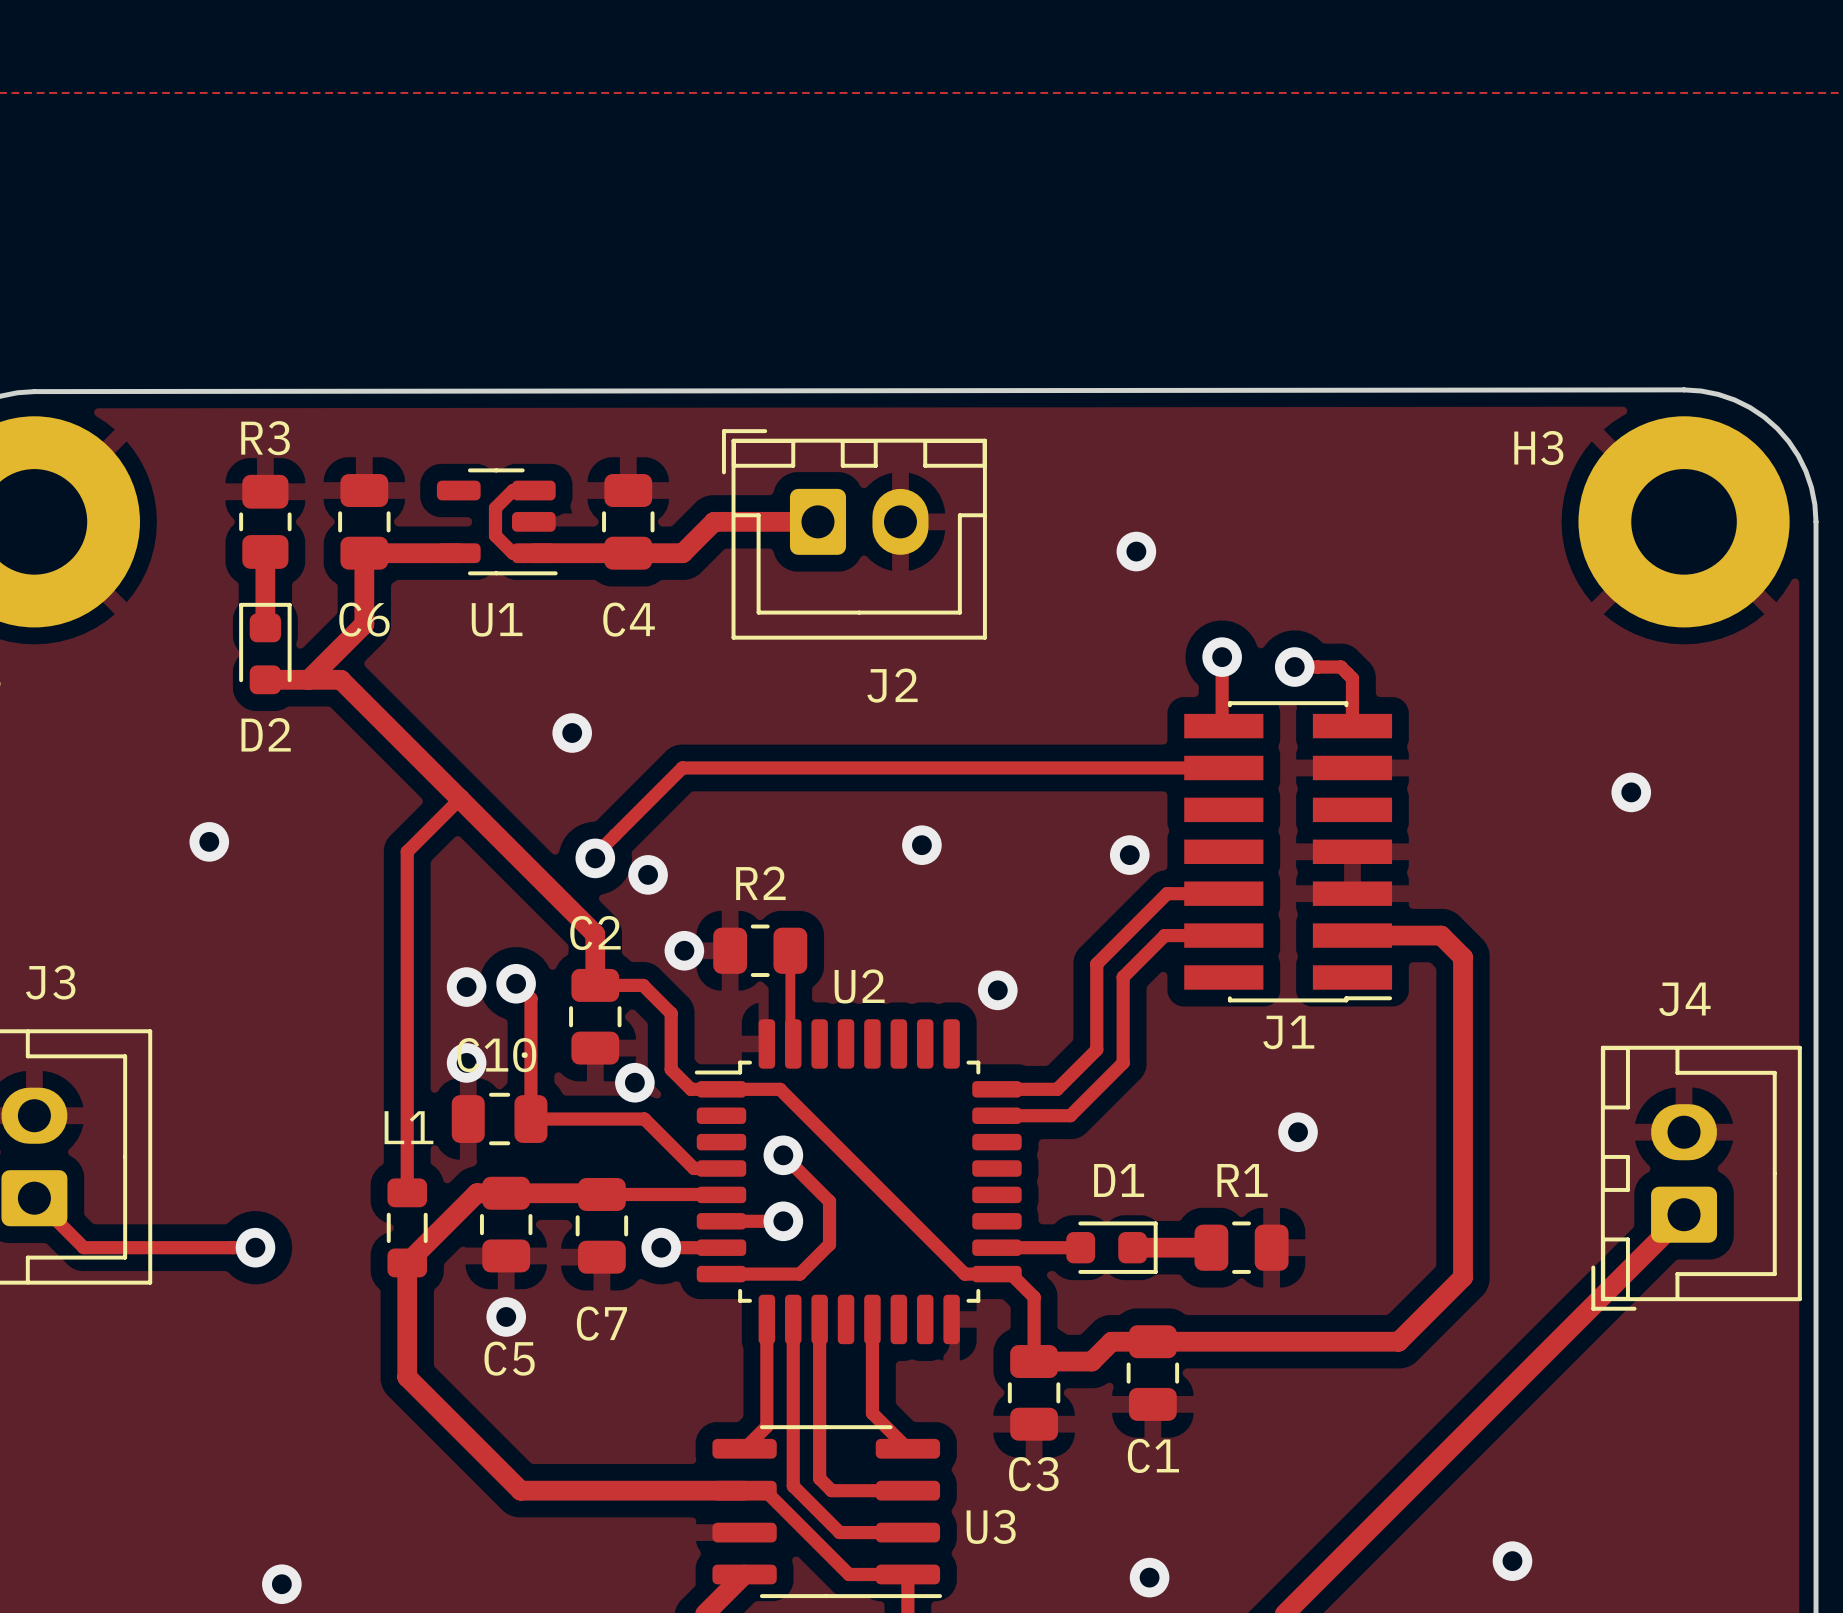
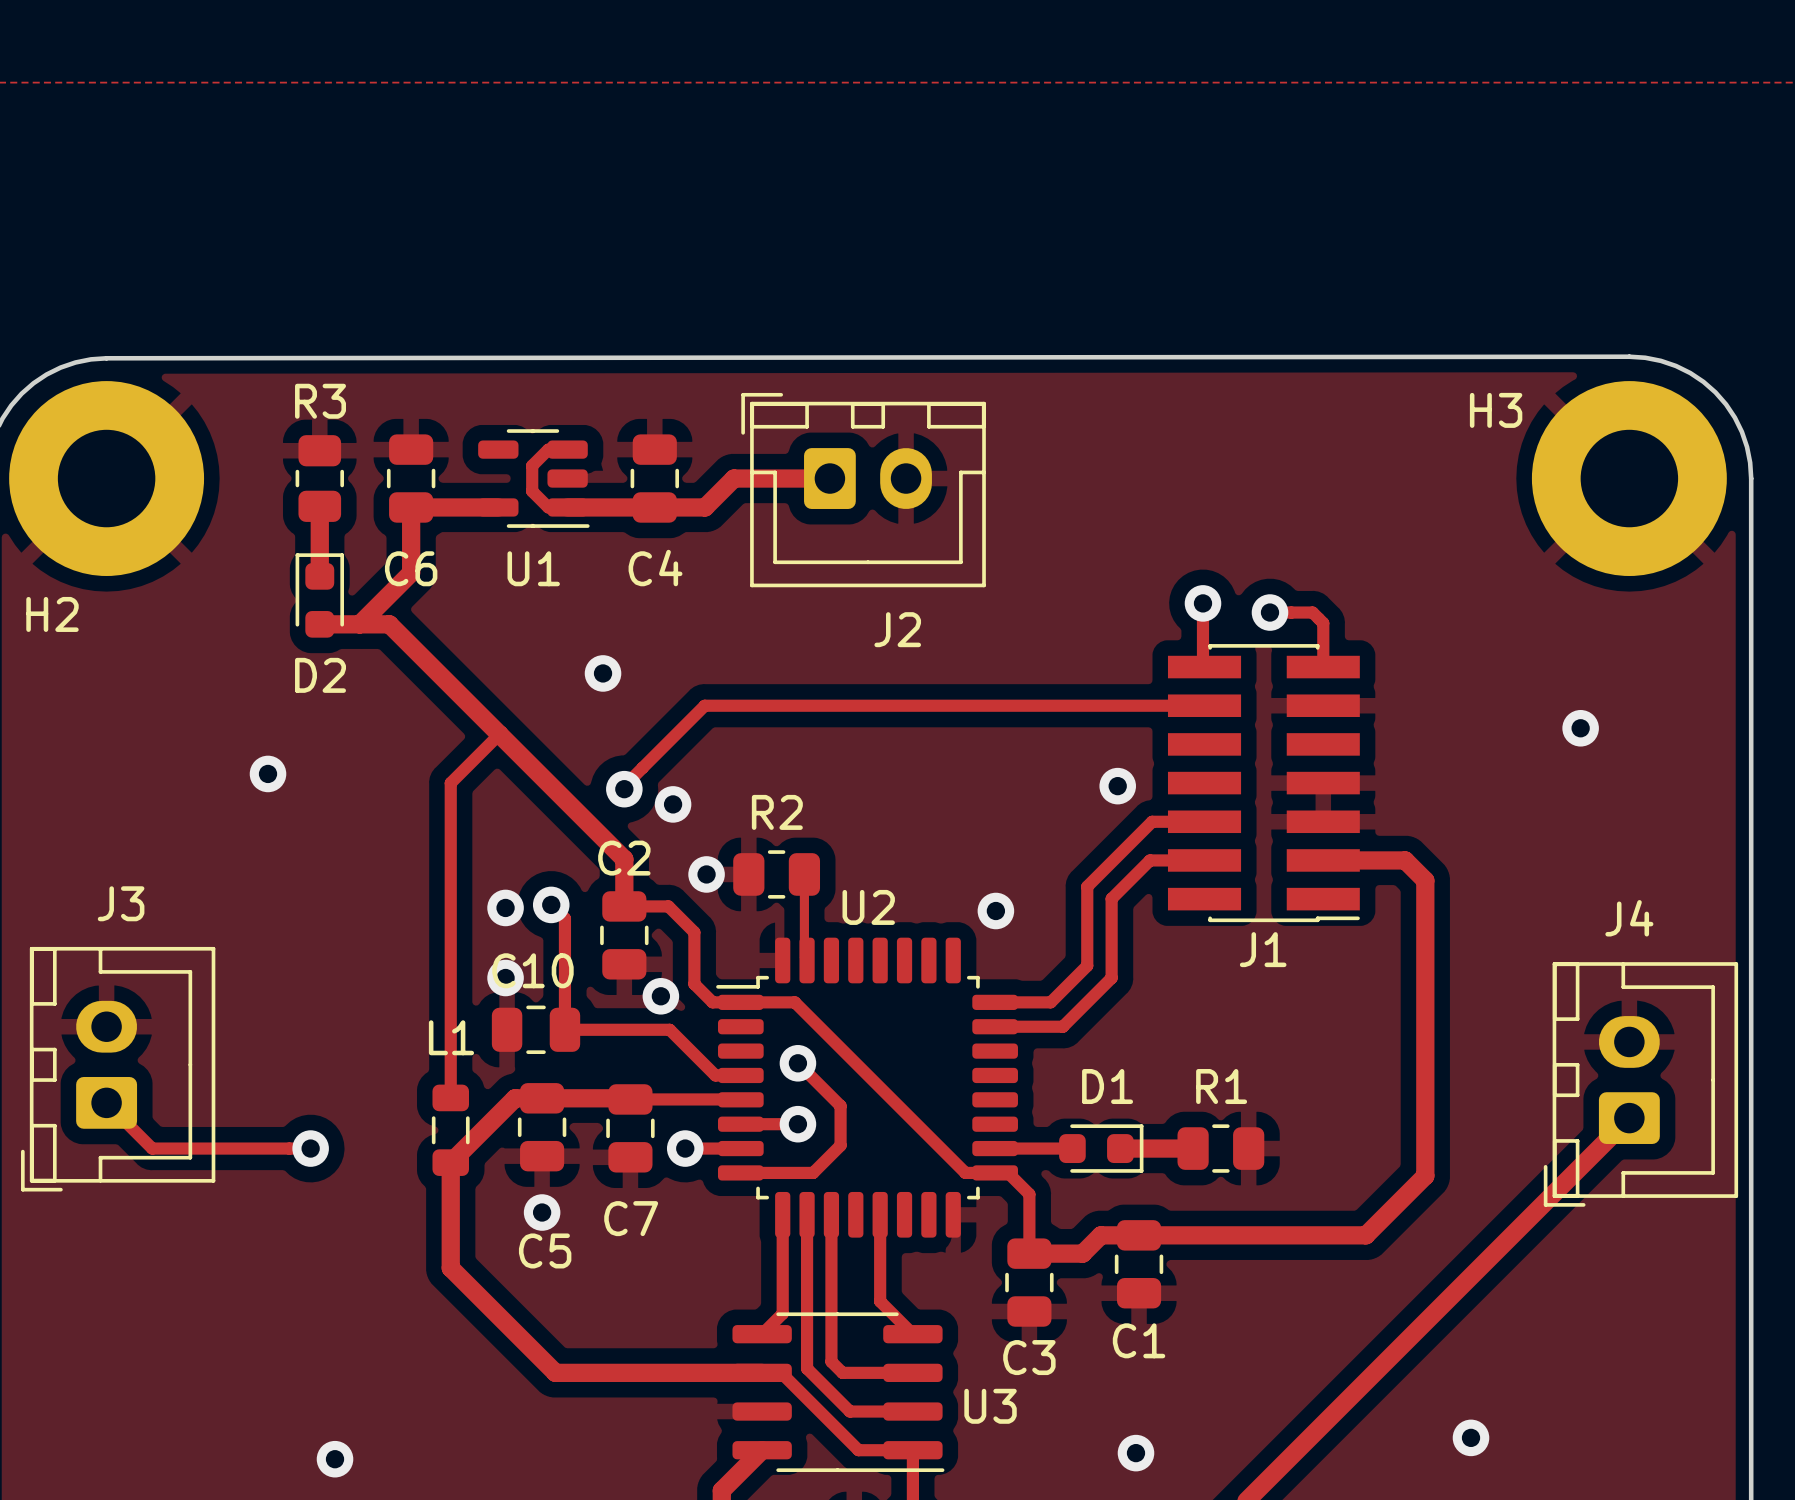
via: (1136, 551) -> none
via: (921, 845) -> none
via: (1298, 1132) -> none

